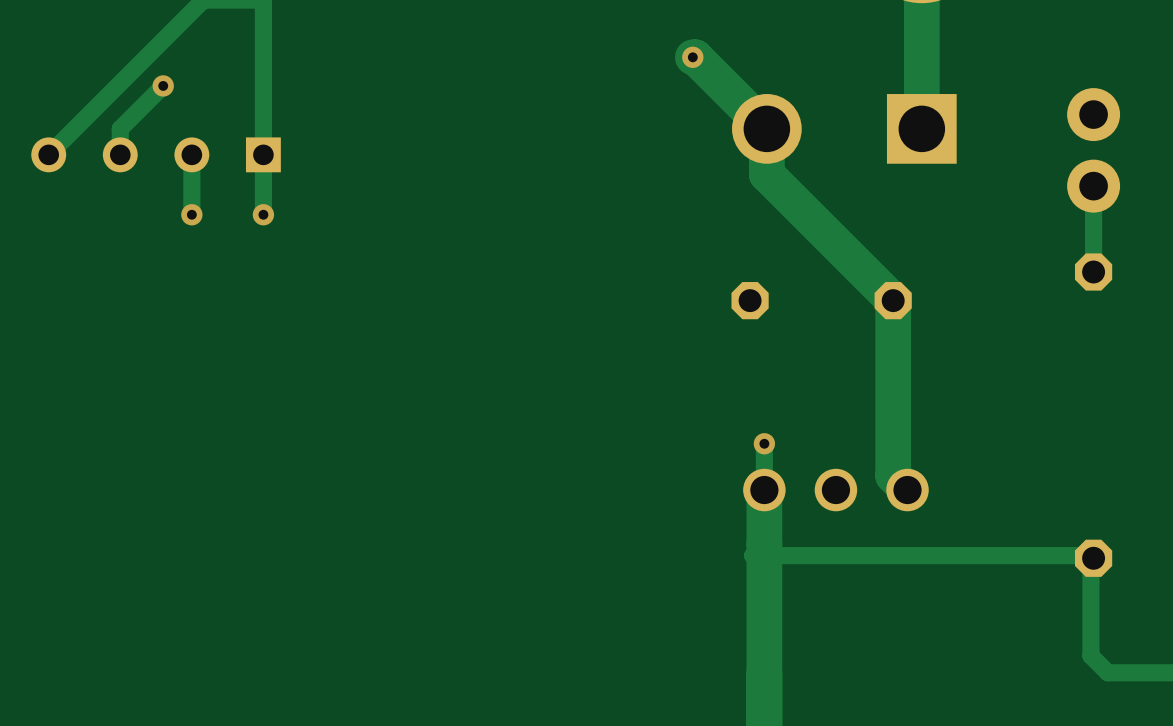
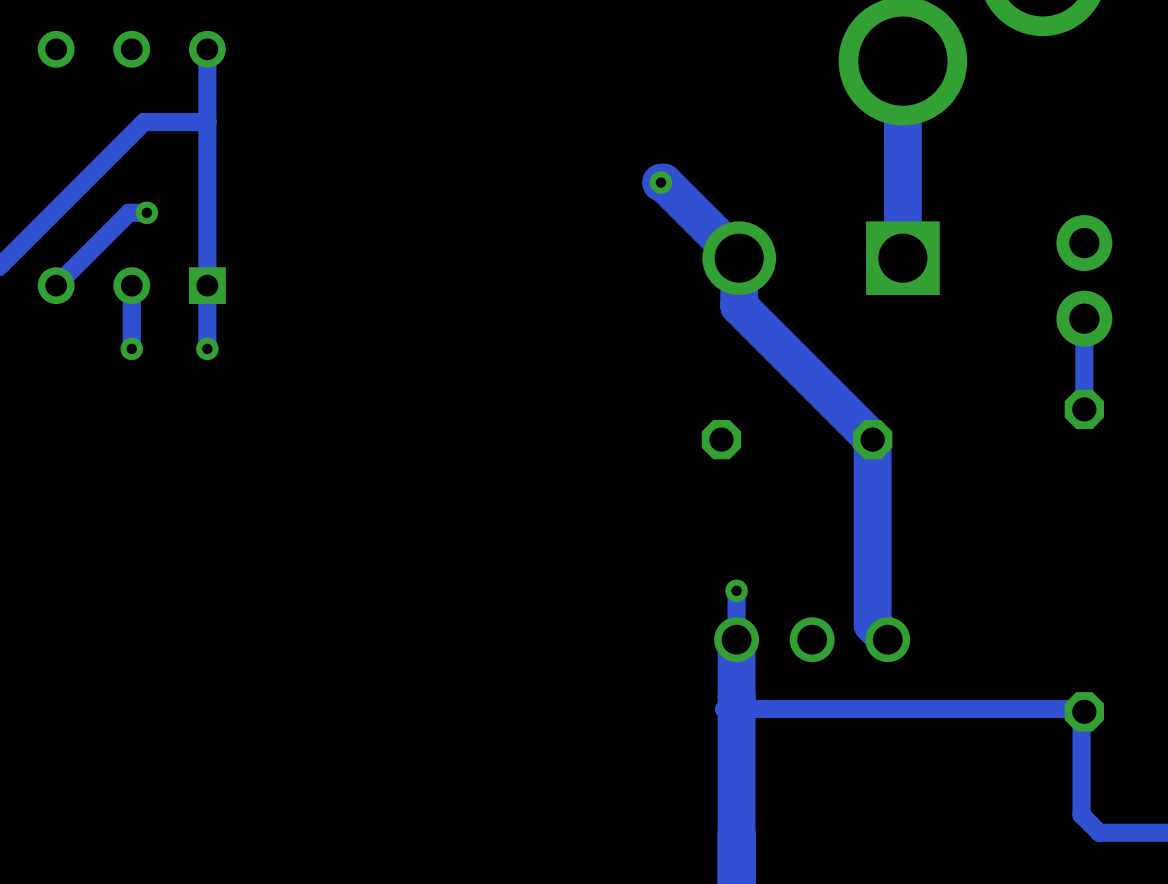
track: (163, 85) (120, 128) (120, 154) -> (146, 212) (128, 212) (56, 285)
via position: (163, 85) -> (146, 212)

